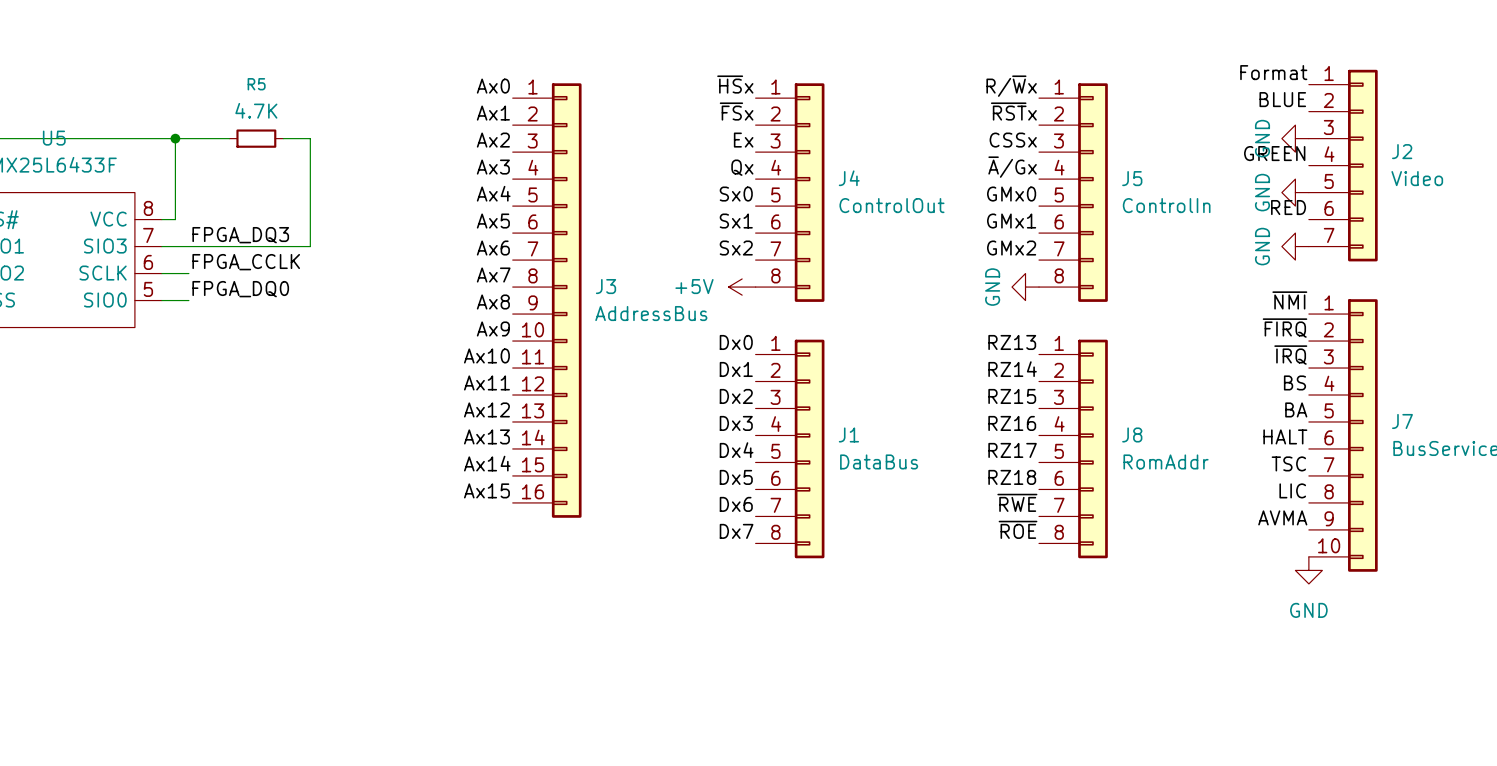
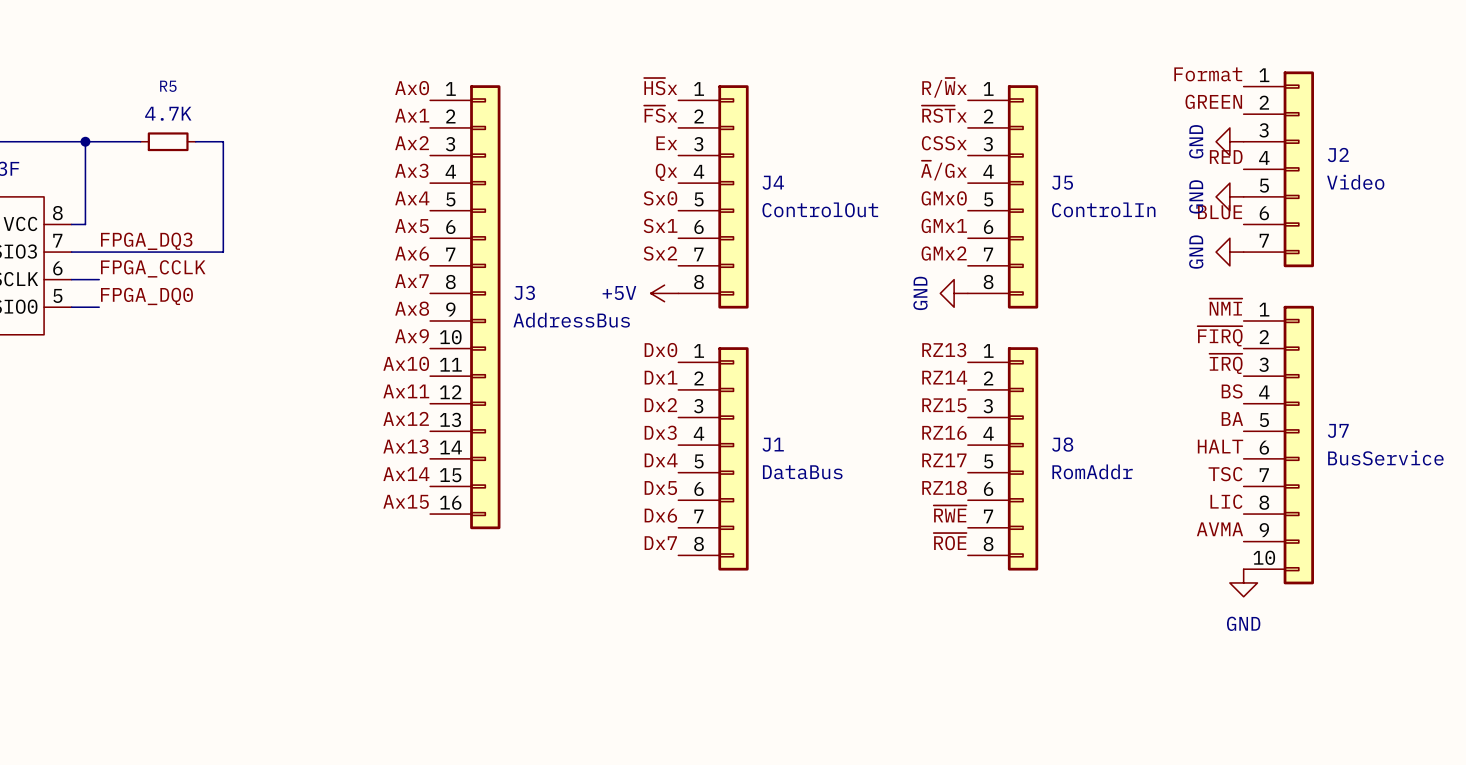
label: BLUE (1282, 99) -> GREEN (1213, 101)
label: GREEN (1274, 153) -> RED (1226, 157)
label: RED (1288, 207) -> BLUE (1220, 212)

